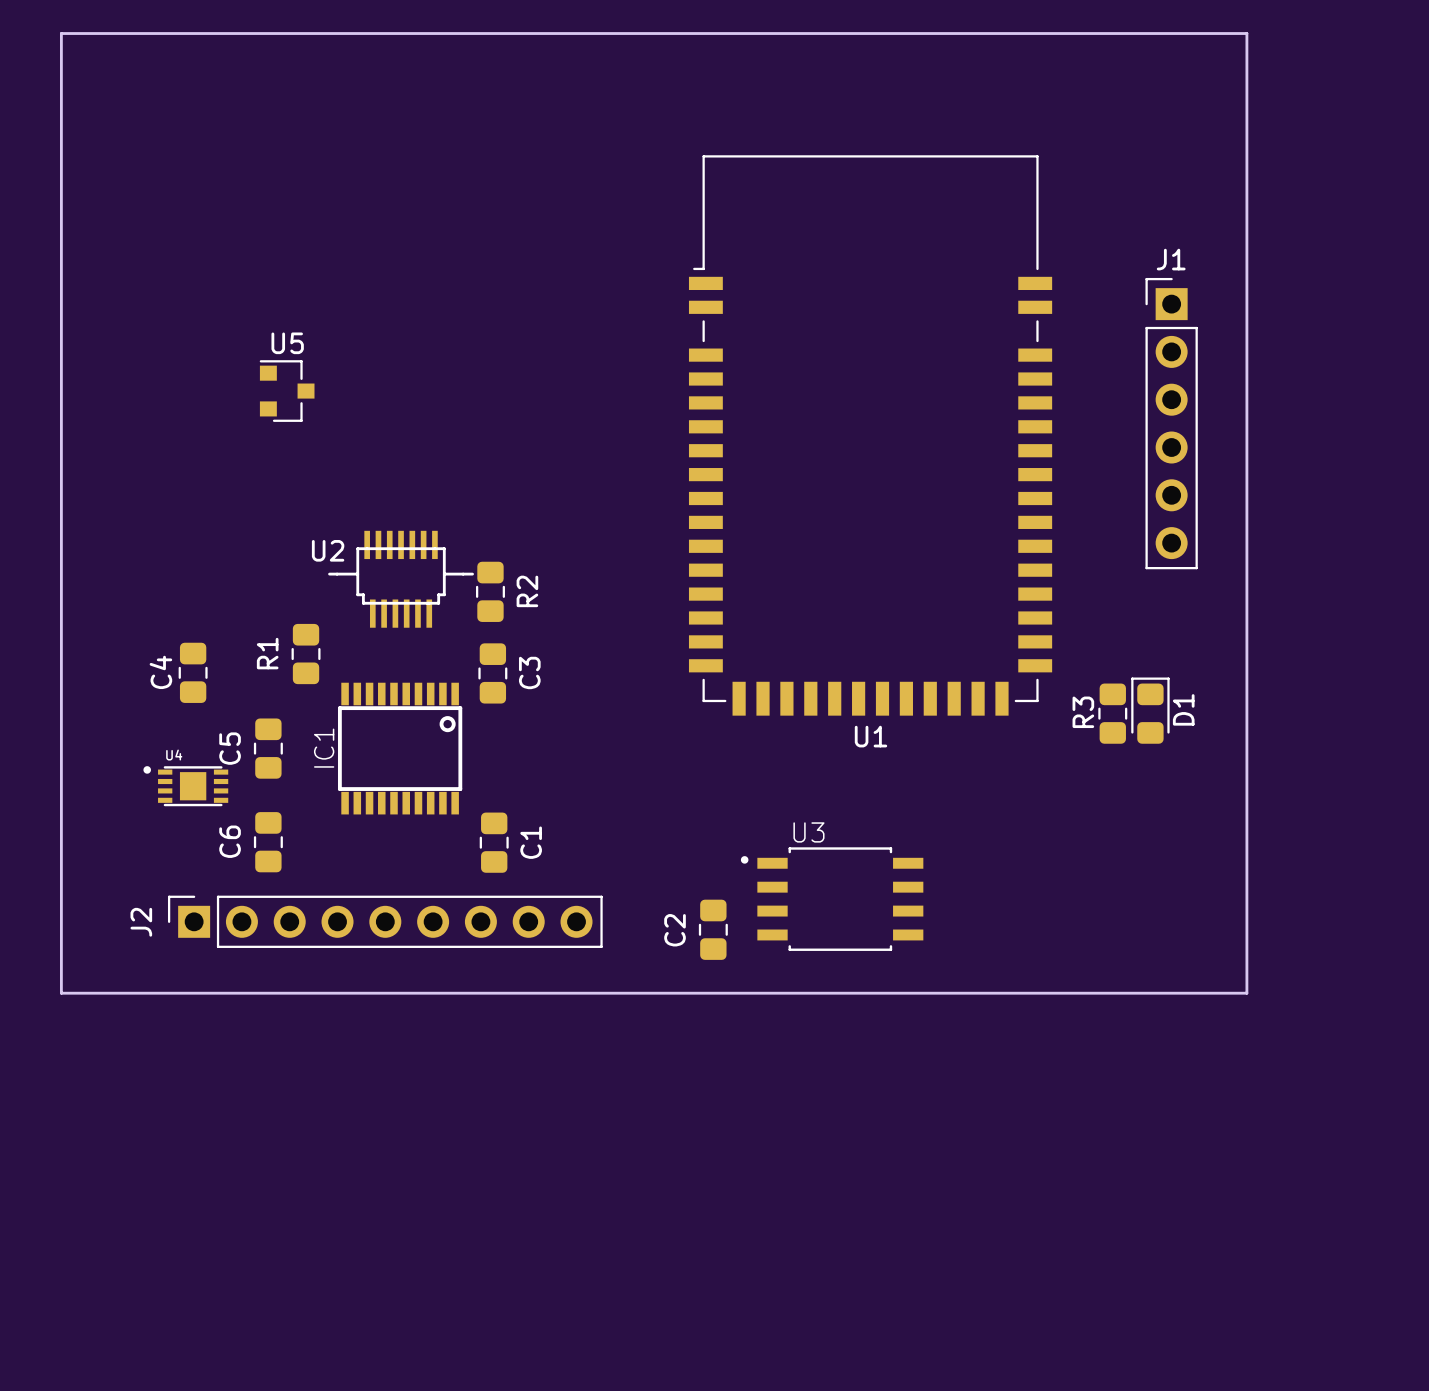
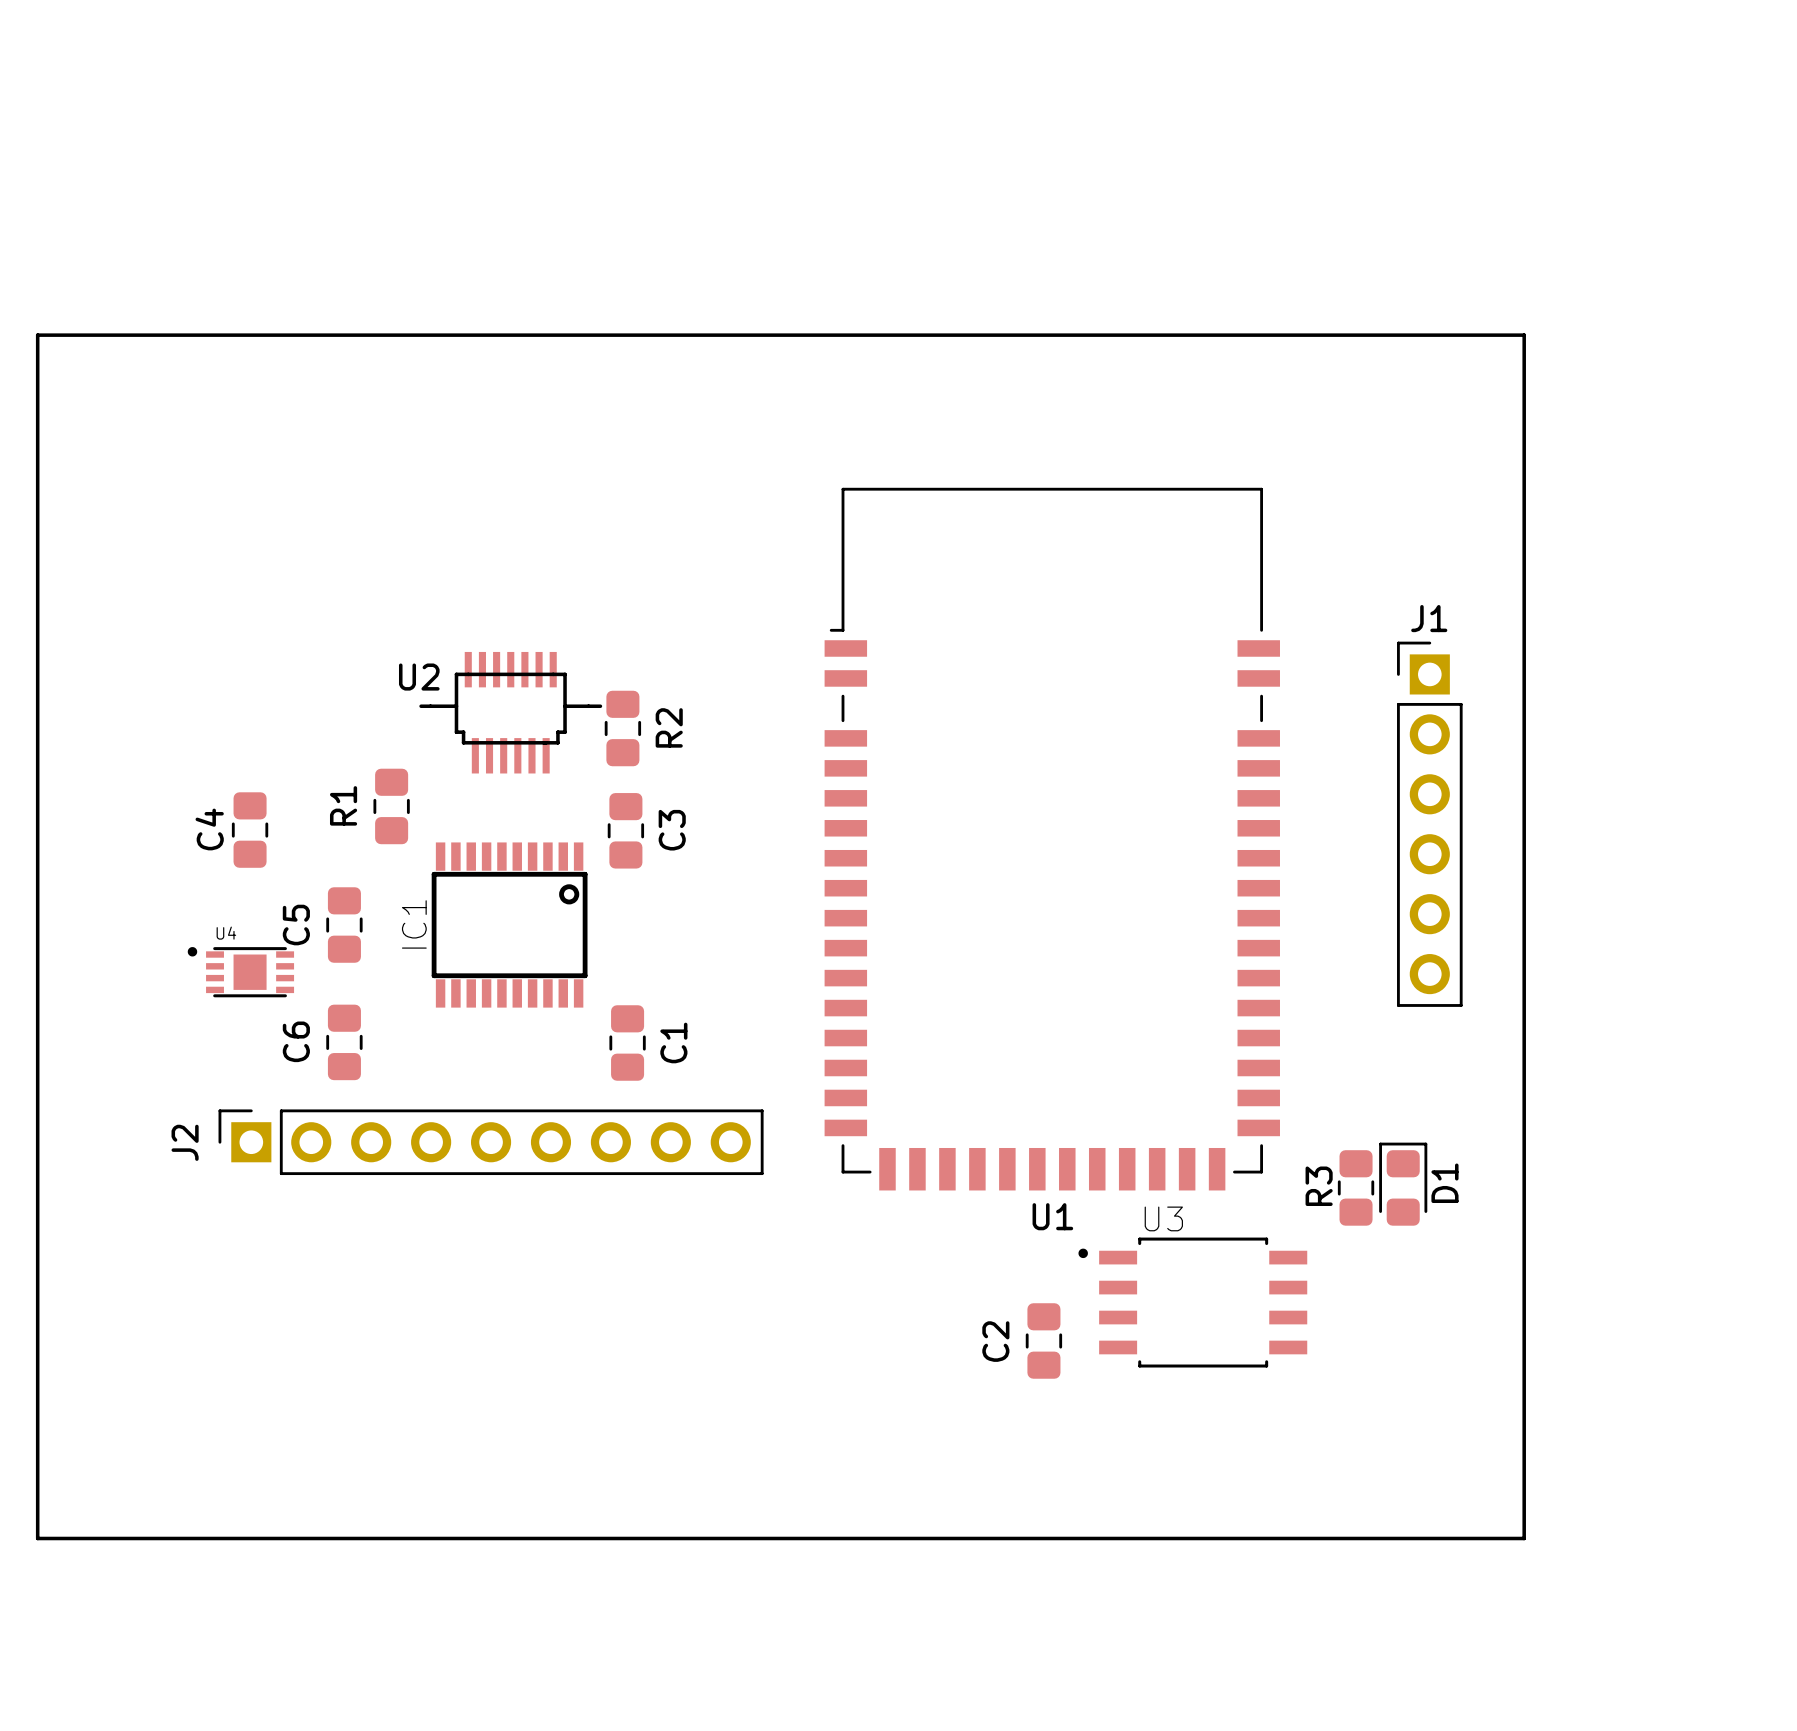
board edge: (61, 33) (1246, 33) (1246, 993) (61, 993) (61, 33) -> (37, 335) (37, 1538) (1524, 1538) (1524, 335) (37, 335)
U5: (287, 391) -> none
J1 position: (1171, 423) -> (1429, 824)
U1 position: (870, 435) -> (1052, 839)
D1 position: (1150, 710) -> (1403, 1184)
R3 position: (1112, 713) -> (1356, 1187)
U3 position: (832, 899) -> (1192, 1302)
C2 position: (713, 929) -> (1043, 1340)

